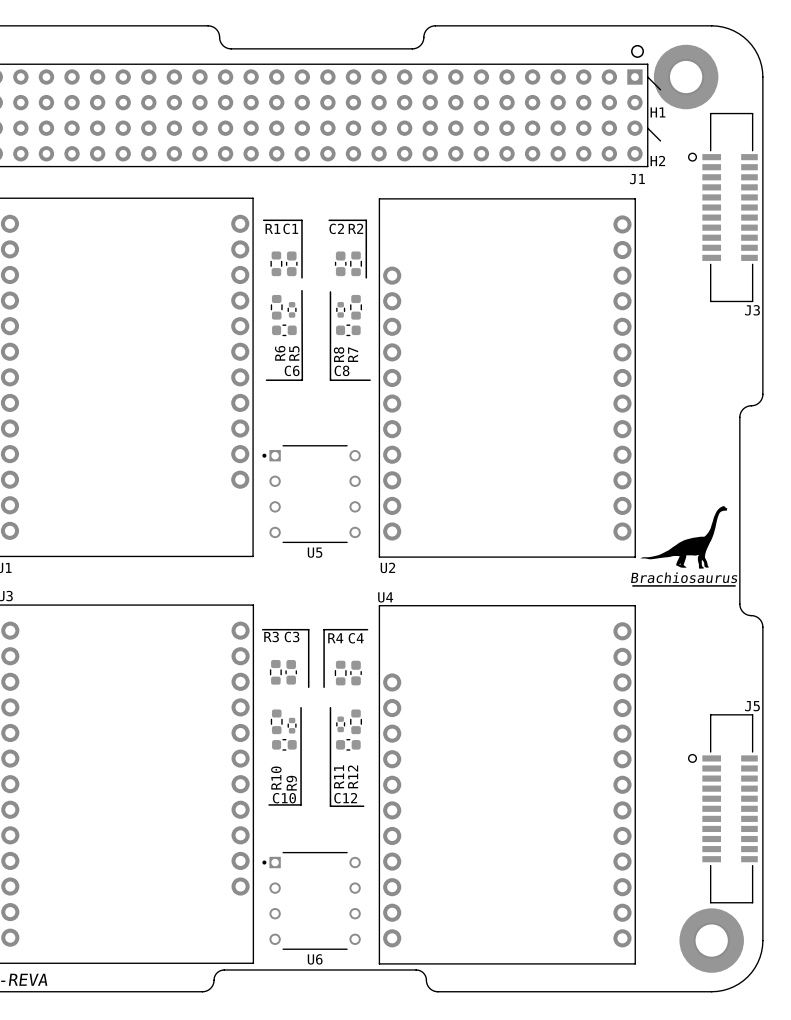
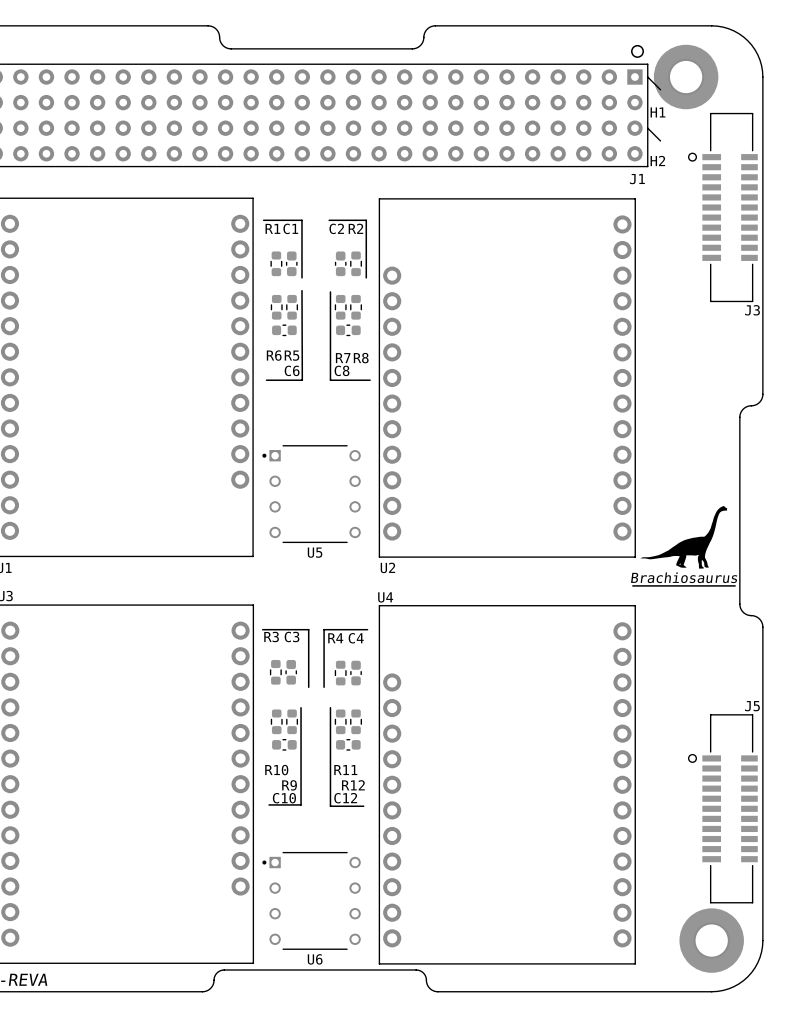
R5 footprint: [287, 302, 297, 318] -> [286, 294, 298, 320]
R7 footprint: [336, 302, 346, 318] -> [334, 294, 347, 320]
R6 name rotation: 0° (280, 353) -> 90° clockwise (274, 355)
R5 name rotation: 0° (294, 353) -> 90° clockwise (292, 355)
R8 name rotation: 0° (339, 354) -> 90° clockwise (361, 358)
R7 name rotation: 0° (353, 354) -> 90° clockwise (343, 358)
R11 footprint: [336, 716, 346, 733] -> [334, 709, 347, 735]
R9 footprint: [287, 717, 297, 734] -> [286, 709, 298, 735]
R11 name rotation: 0° (339, 776) -> 90° clockwise (345, 770)
R12 name rotation: 0° (353, 776) -> 90° clockwise (353, 785)
R10 name rotation: 0° (276, 778) -> 90° clockwise (276, 770)
R9 name rotation: 0° (291, 783) -> 90° clockwise (289, 785)

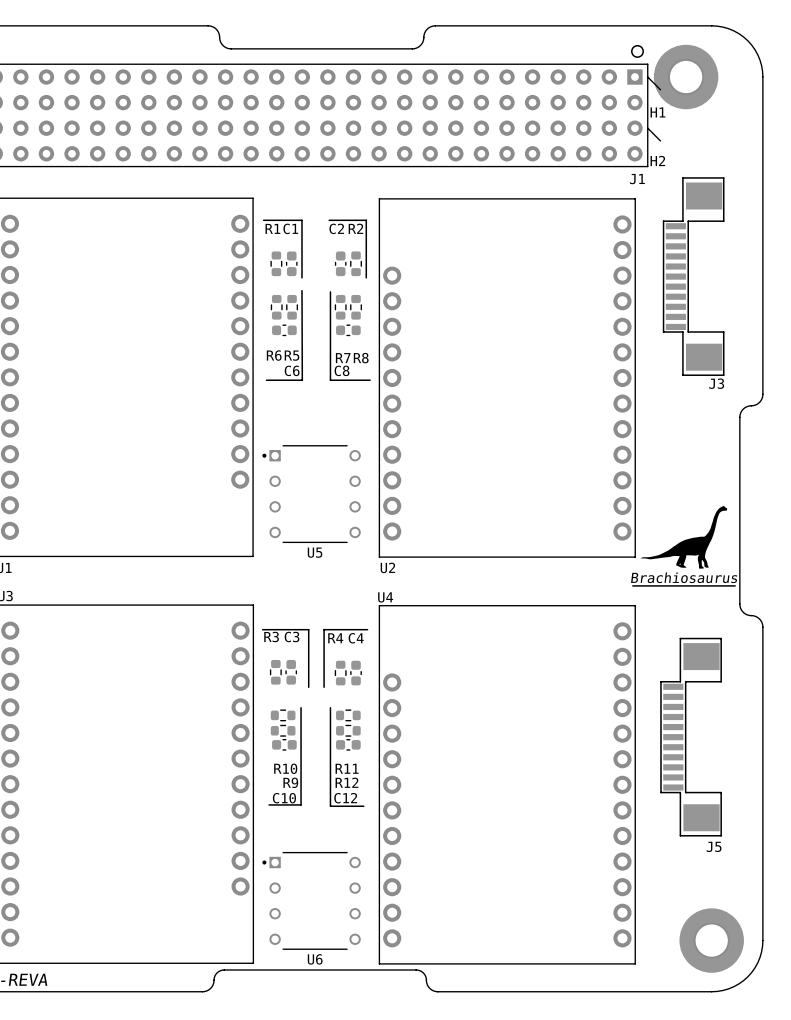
J3 footprint: [688, 112, 758, 303] -> [662, 177, 725, 376]
J5 name position: J5 (752, 706) -> J5 (714, 846)
J5 footprint: [688, 714, 758, 904] -> [660, 637, 722, 837]
R10 rotation: 0° (276, 721) -> 90° clockwise (283, 715)
R9 rotation: 0° (292, 721) -> 90° clockwise (283, 730)
R11 rotation: 0° (340, 721) -> 90° clockwise (348, 715)
R12 rotation: 0° (356, 721) -> 90° clockwise (348, 730)

